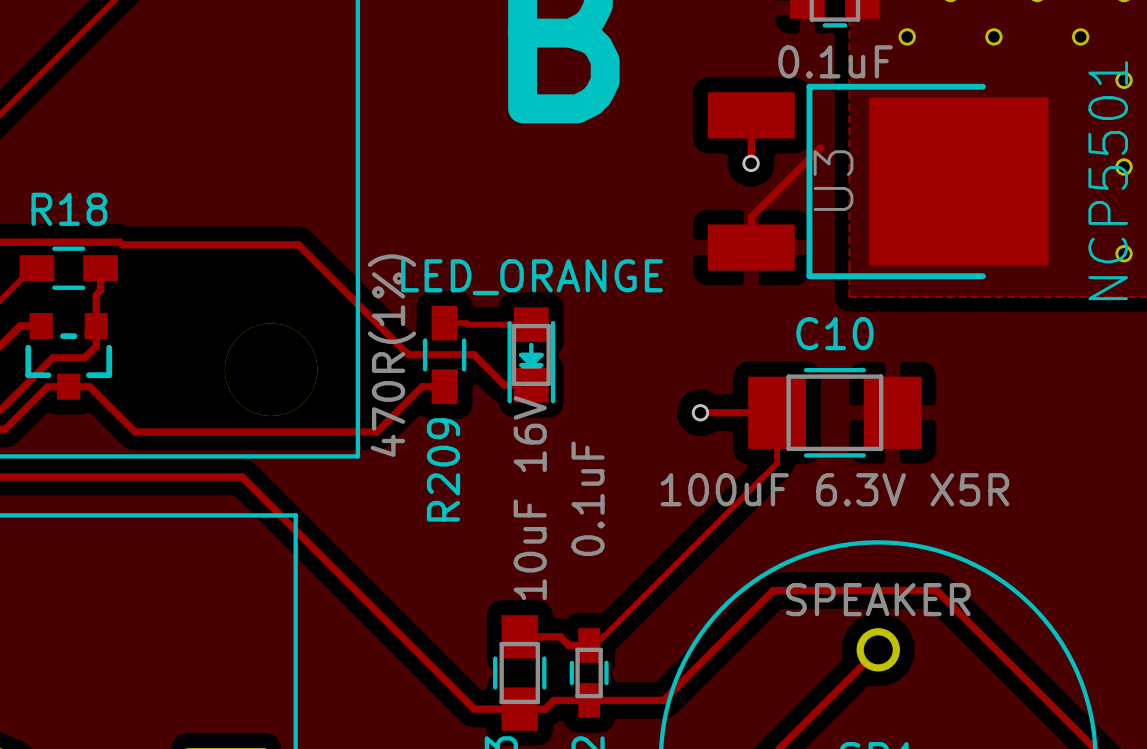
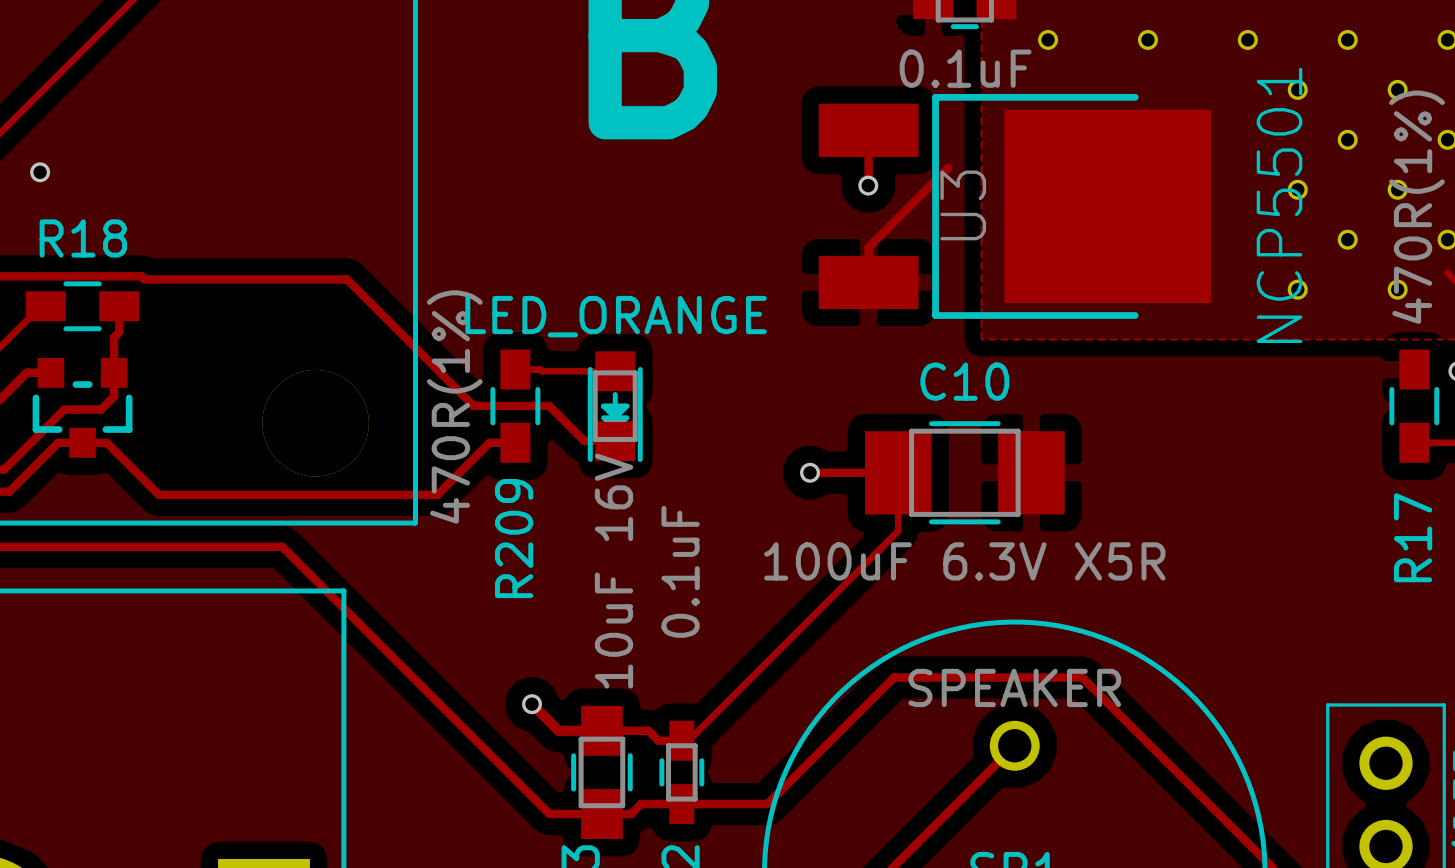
via: none -> (40, 172)
track: none -> (532, 704) (558, 730) (601, 730)
via: none -> (532, 704)

